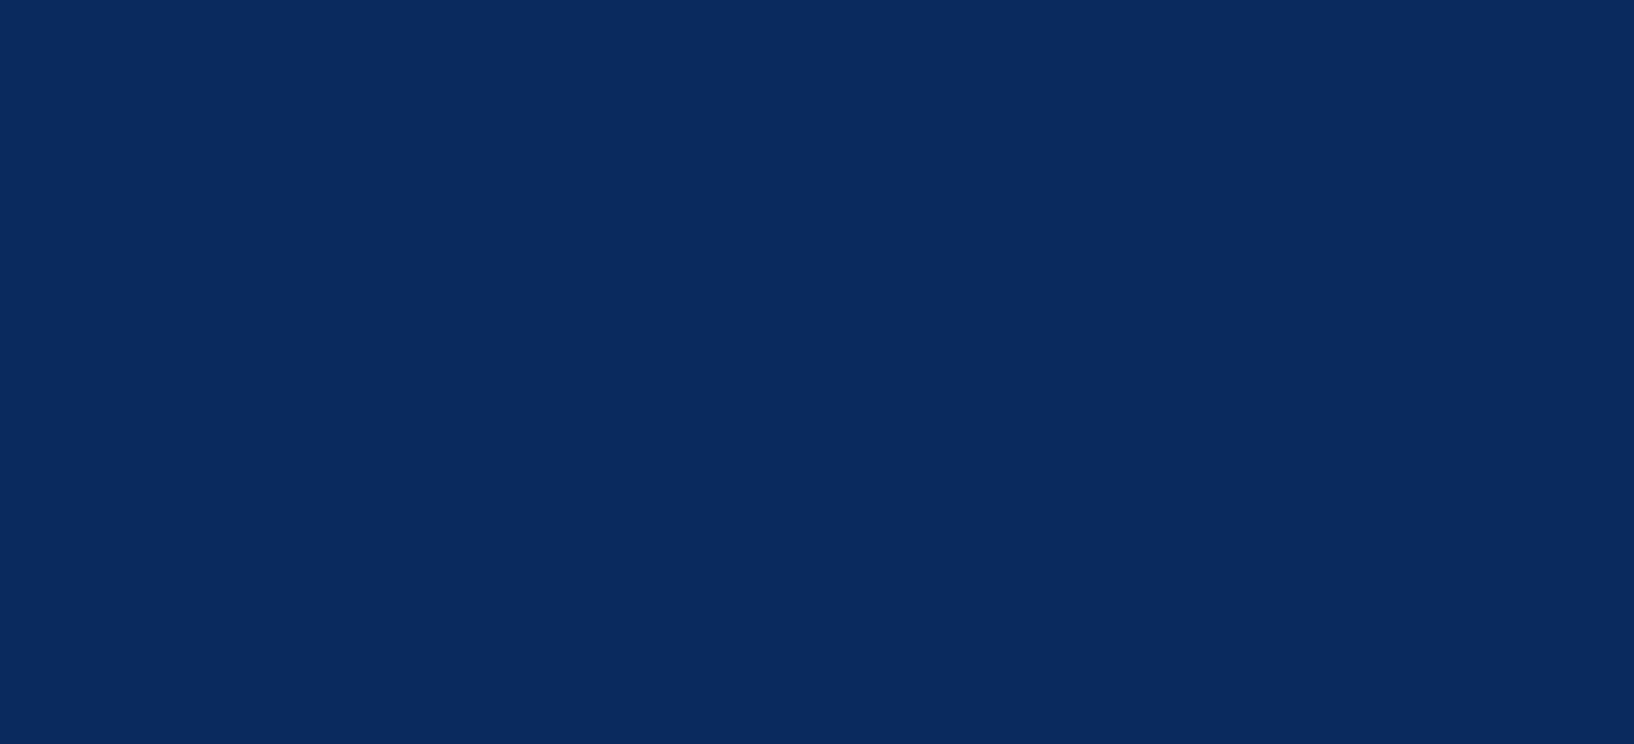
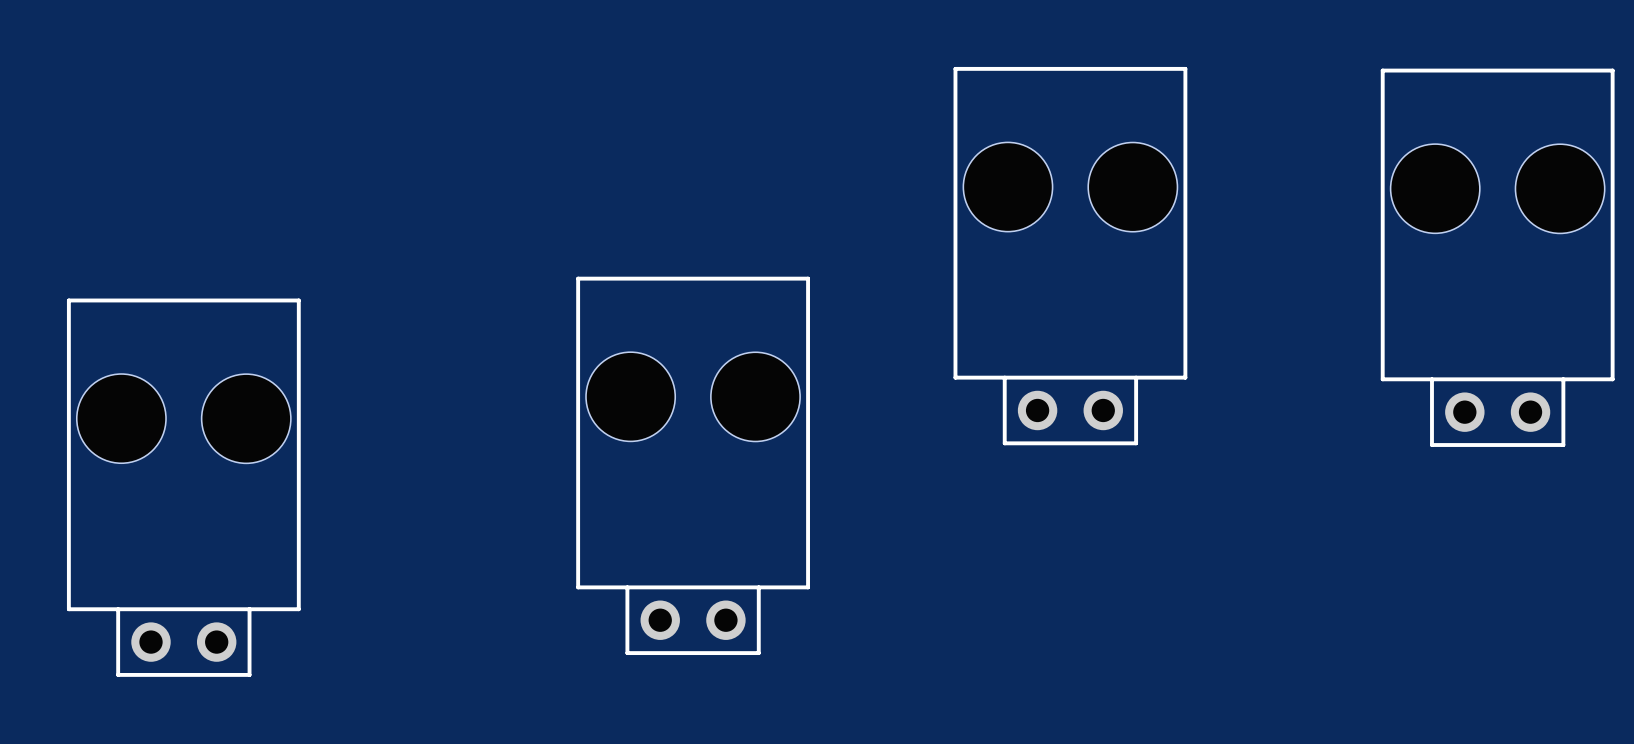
part: none -> (1070, 256)
part: none -> (1497, 257)
part: none -> (693, 465)
part: none -> (183, 487)

